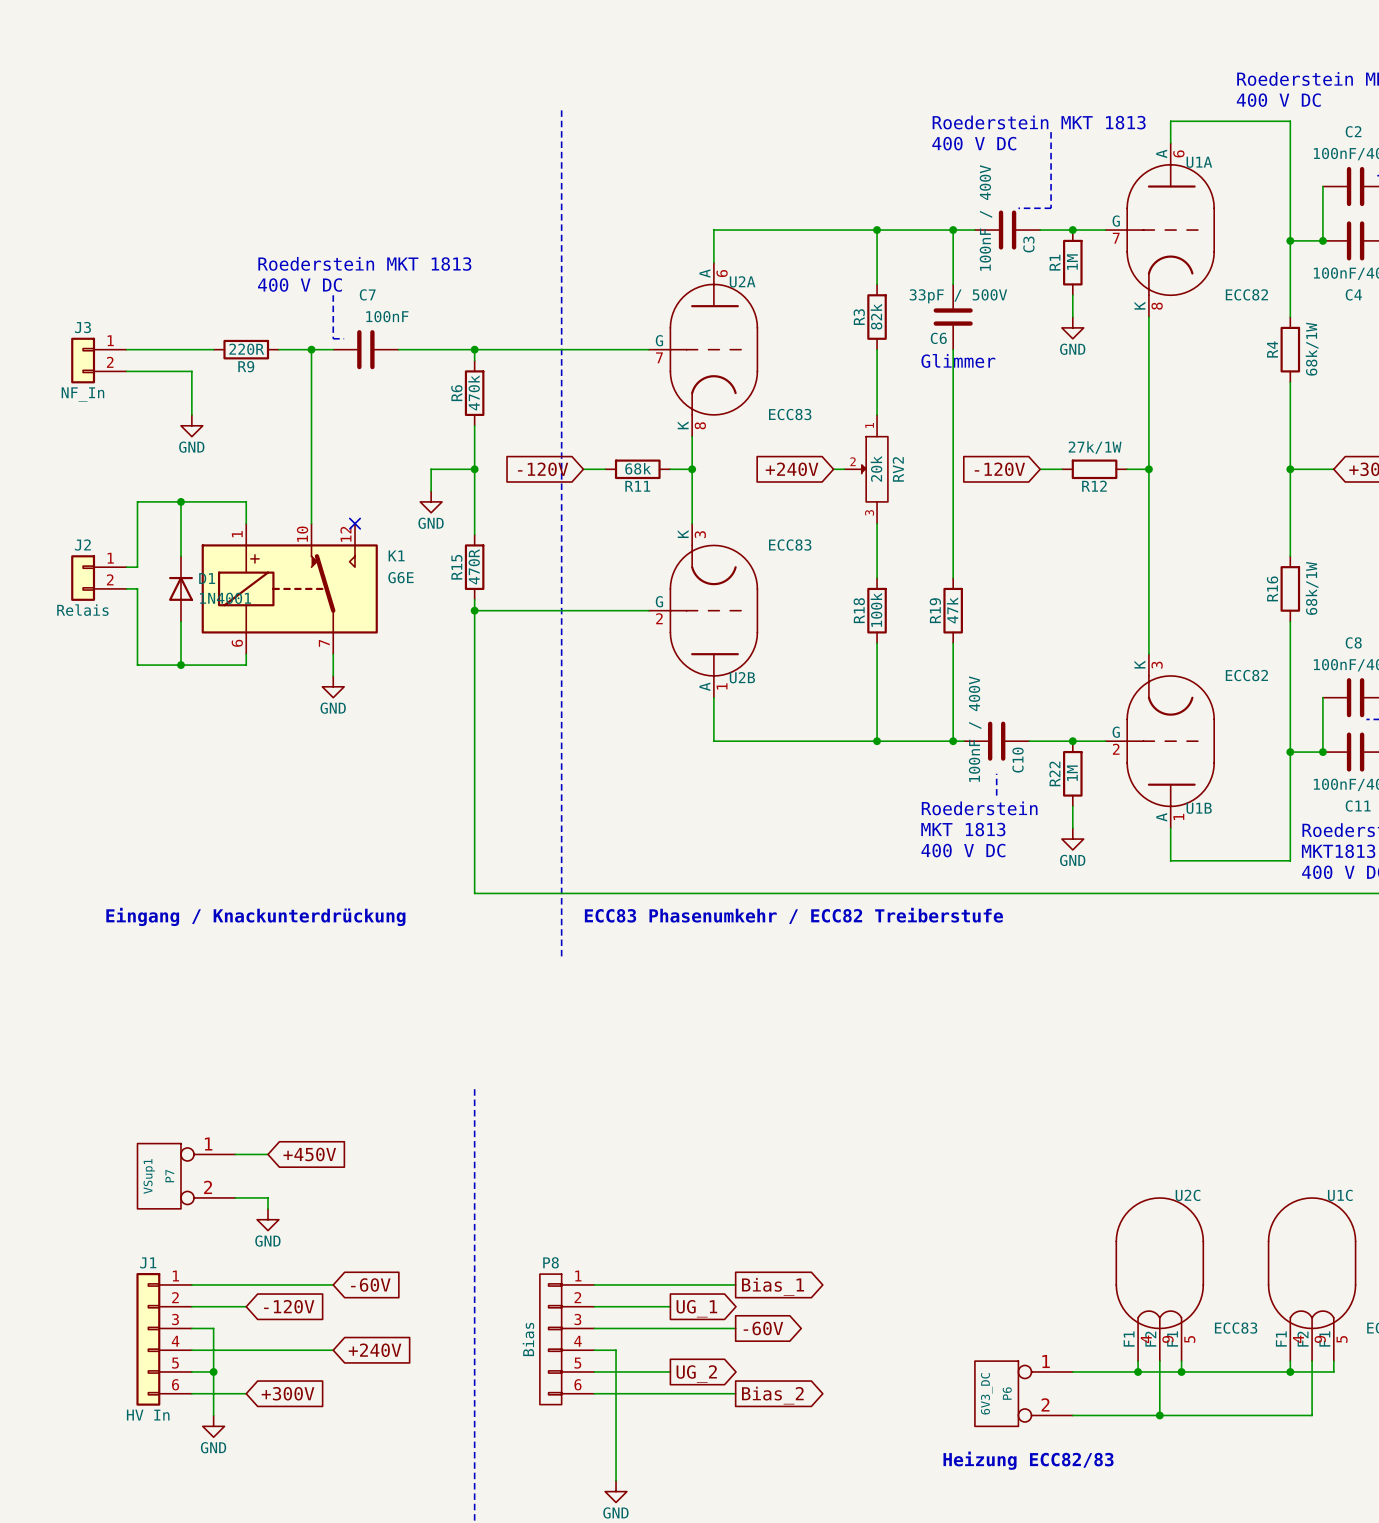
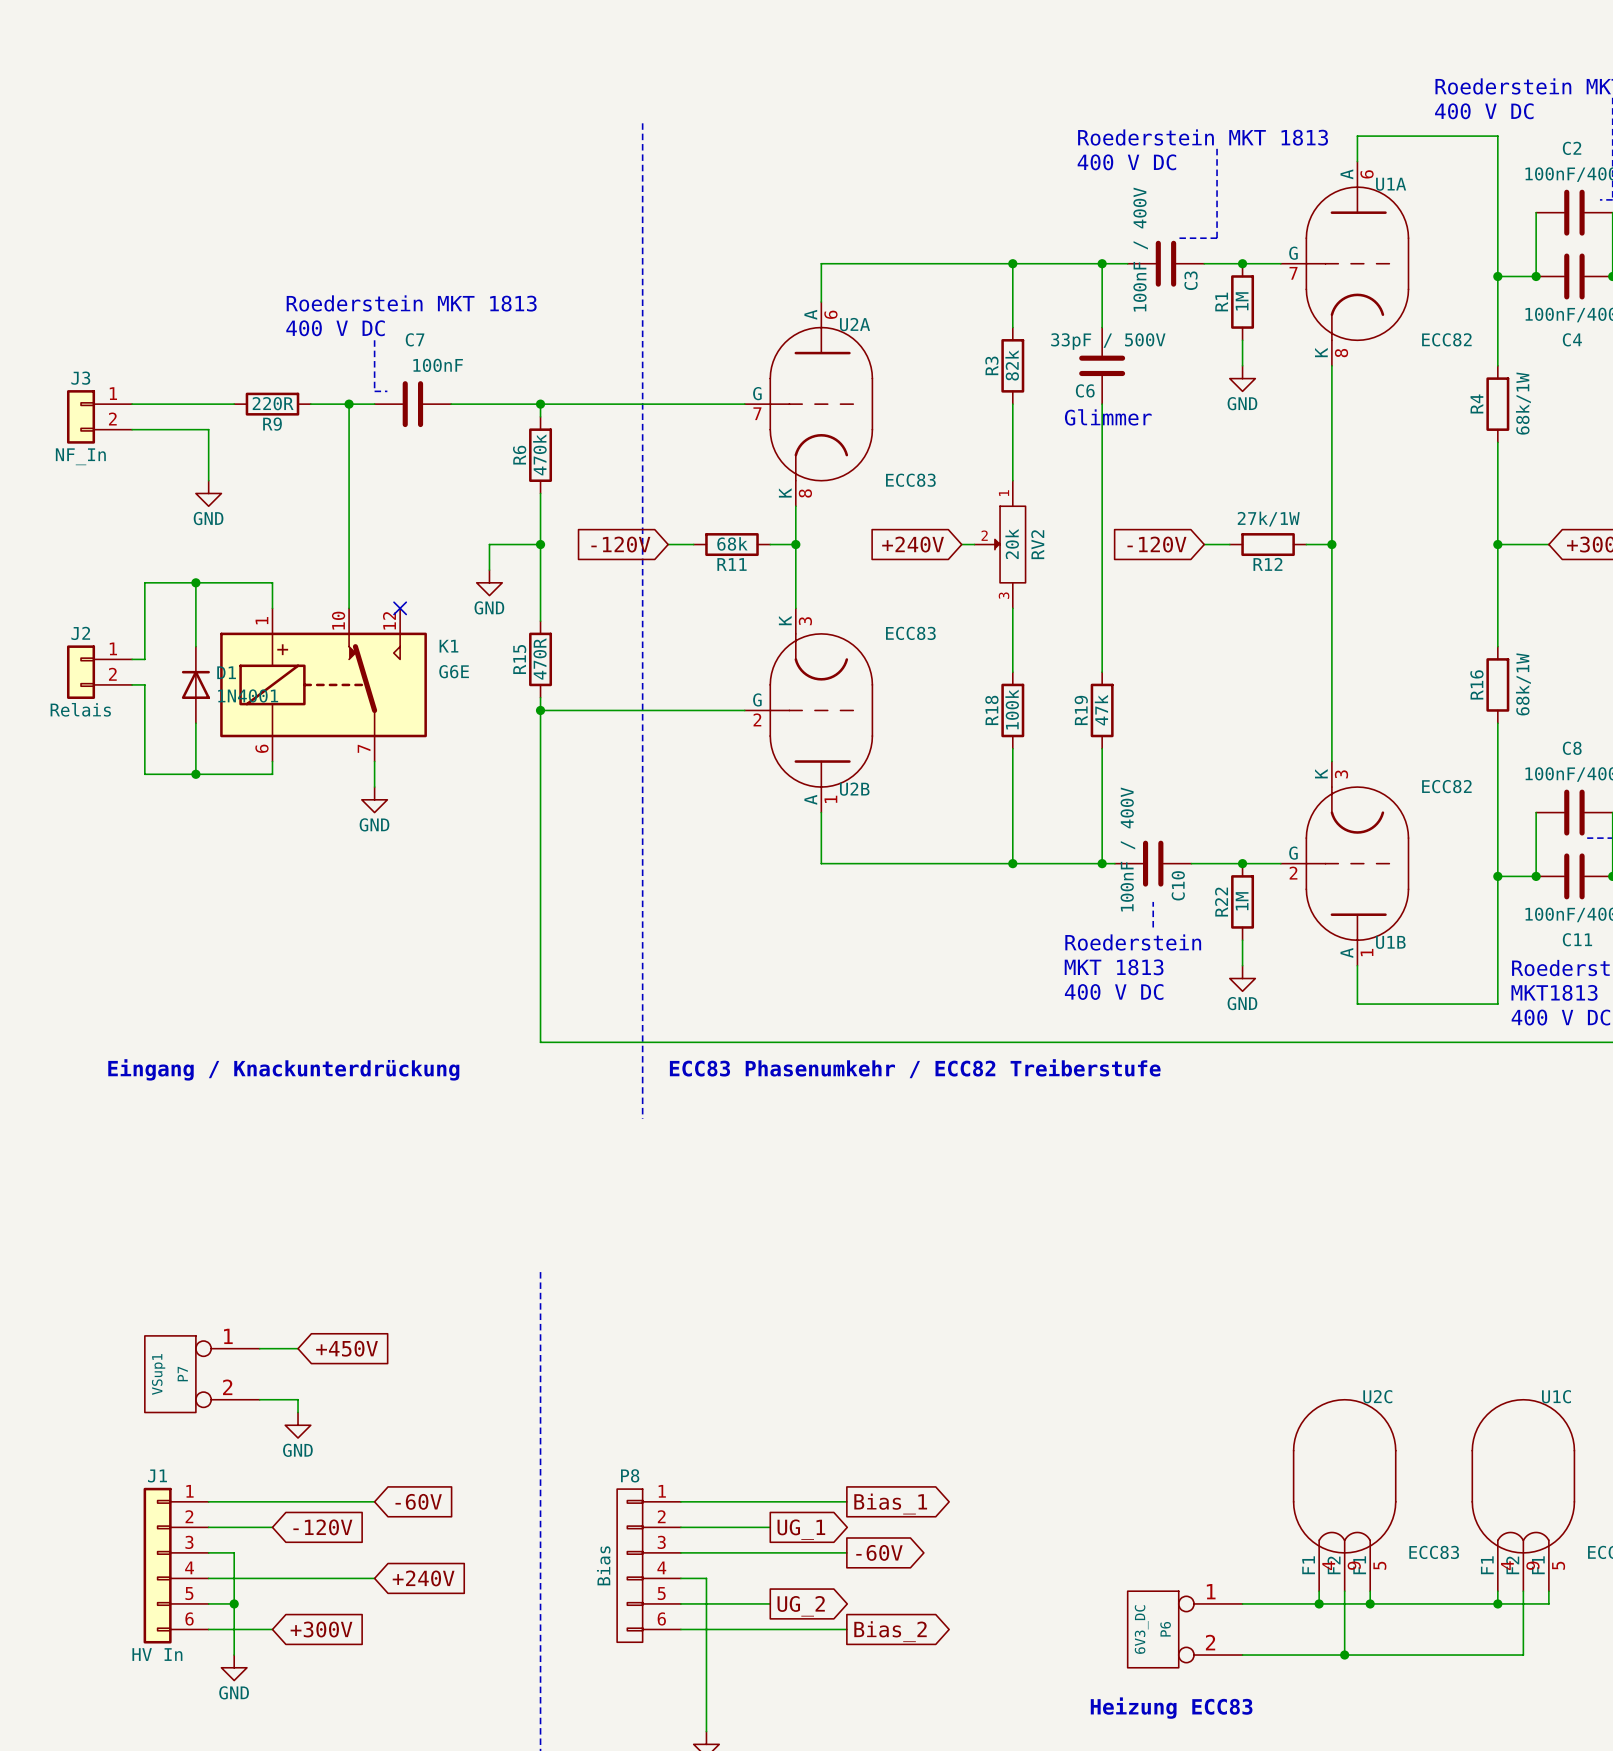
text: Heizung ECC82/83 (1028, 1460) -> Heizung ECC83 (1171, 1708)

